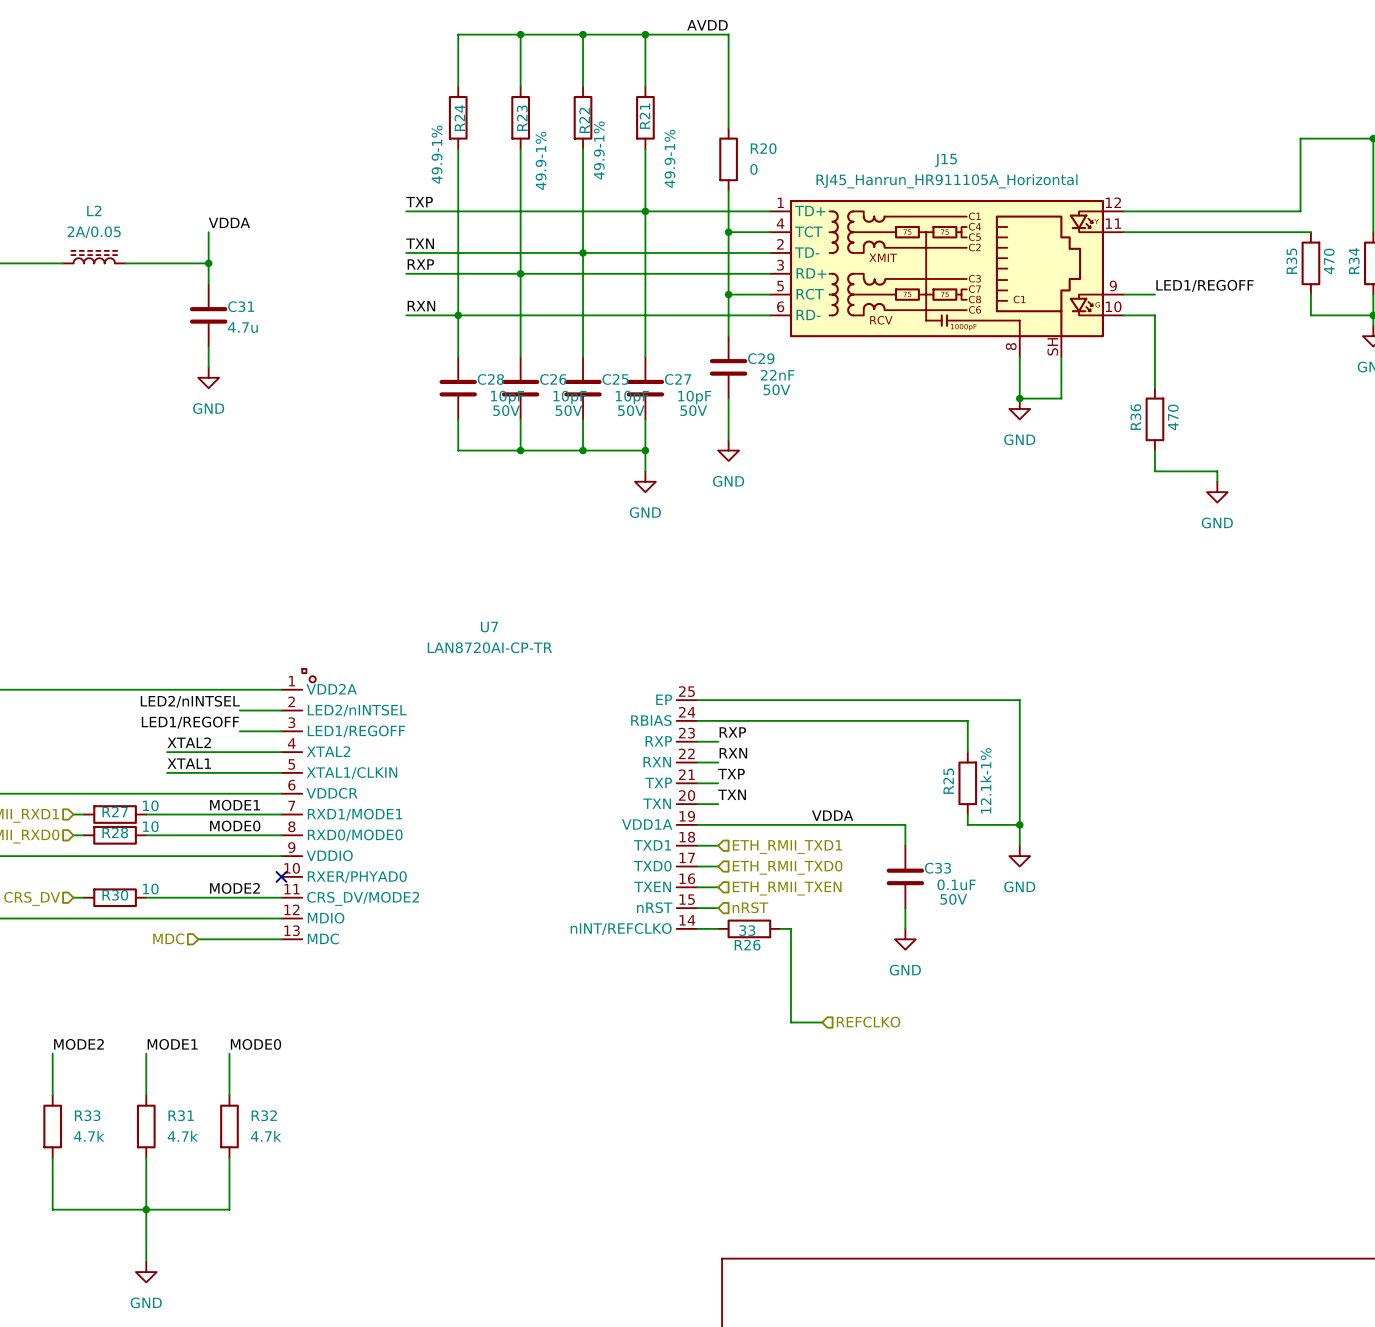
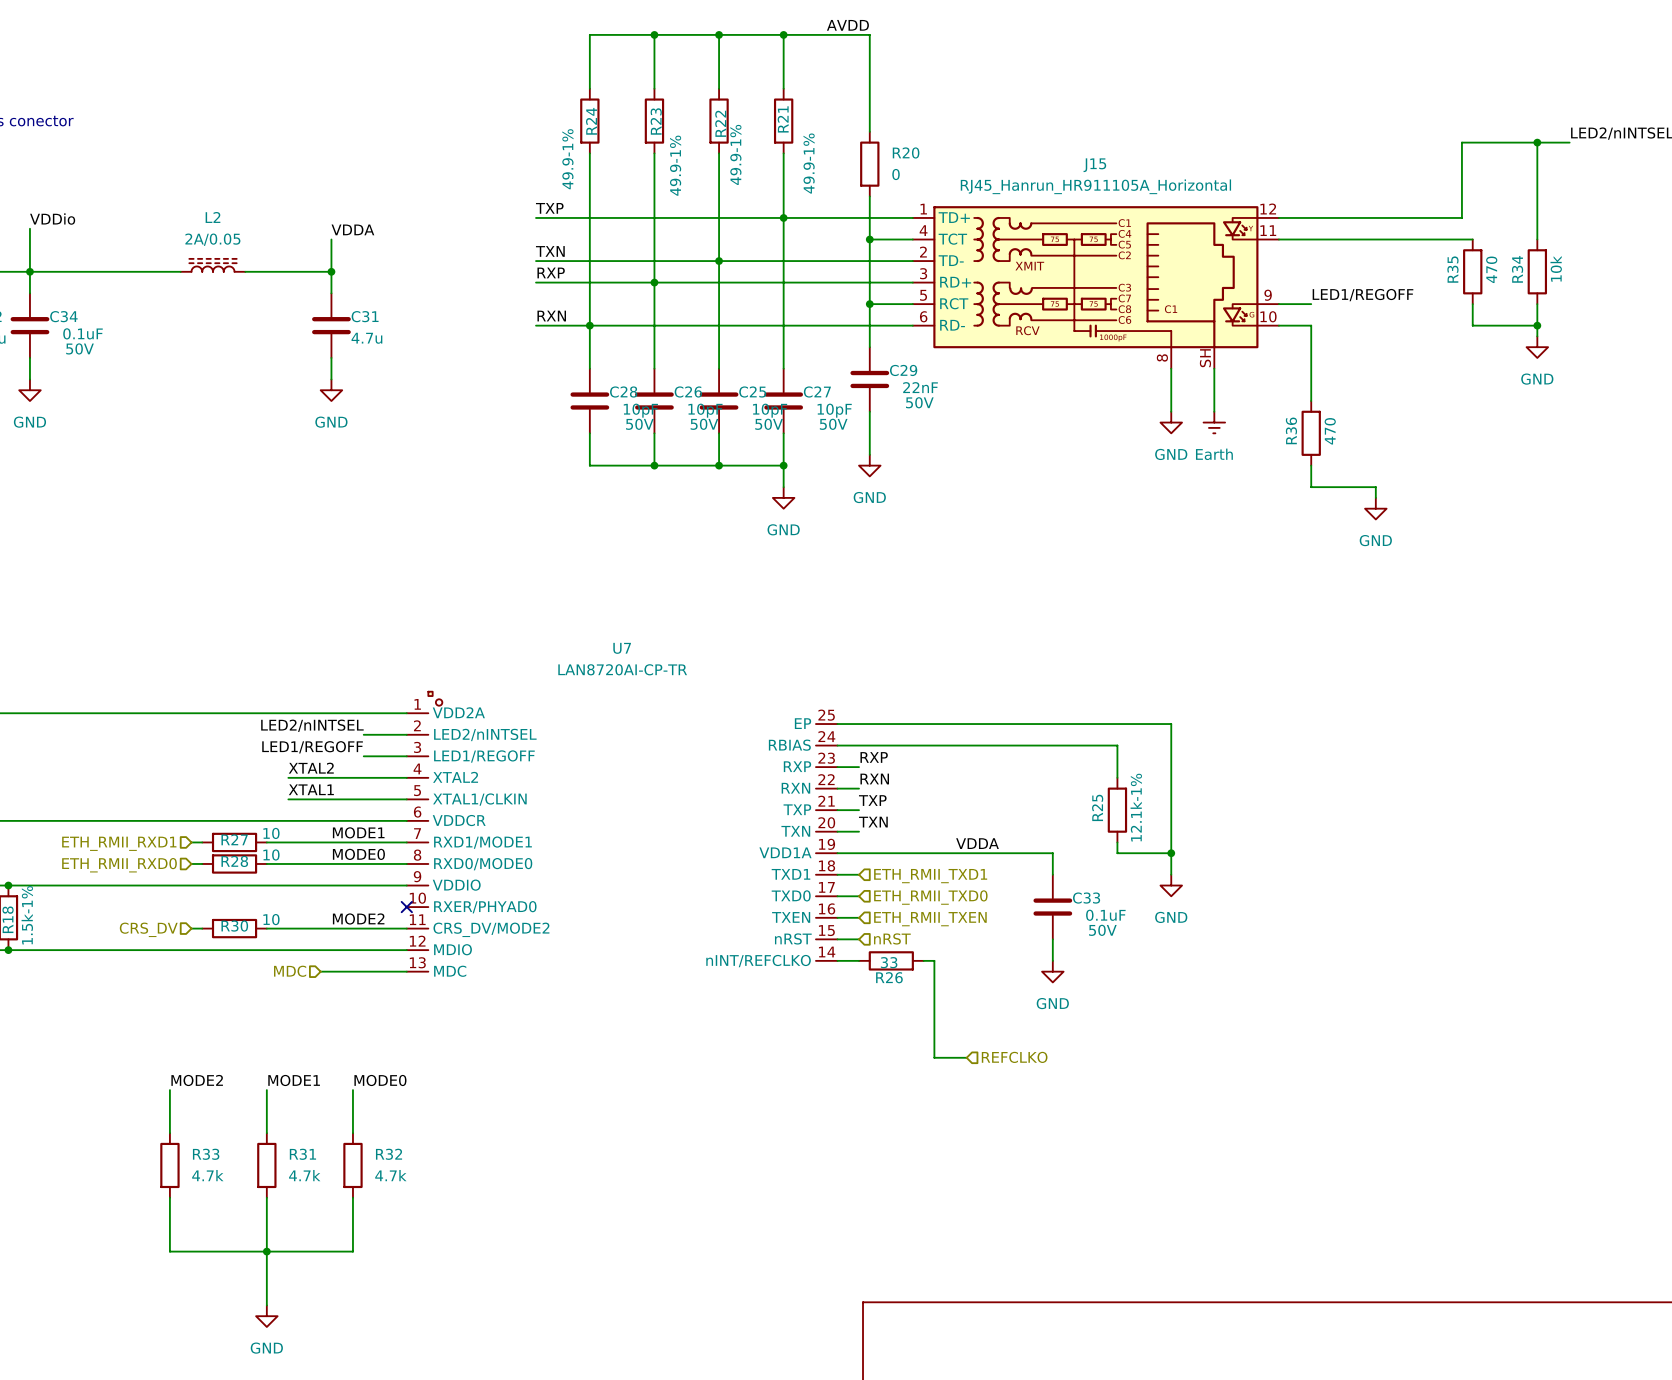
wire: (1019, 398) (1061, 398) -> none
junction: (1019, 398) -> none
power symbol: none -> Earth (1214, 422)

